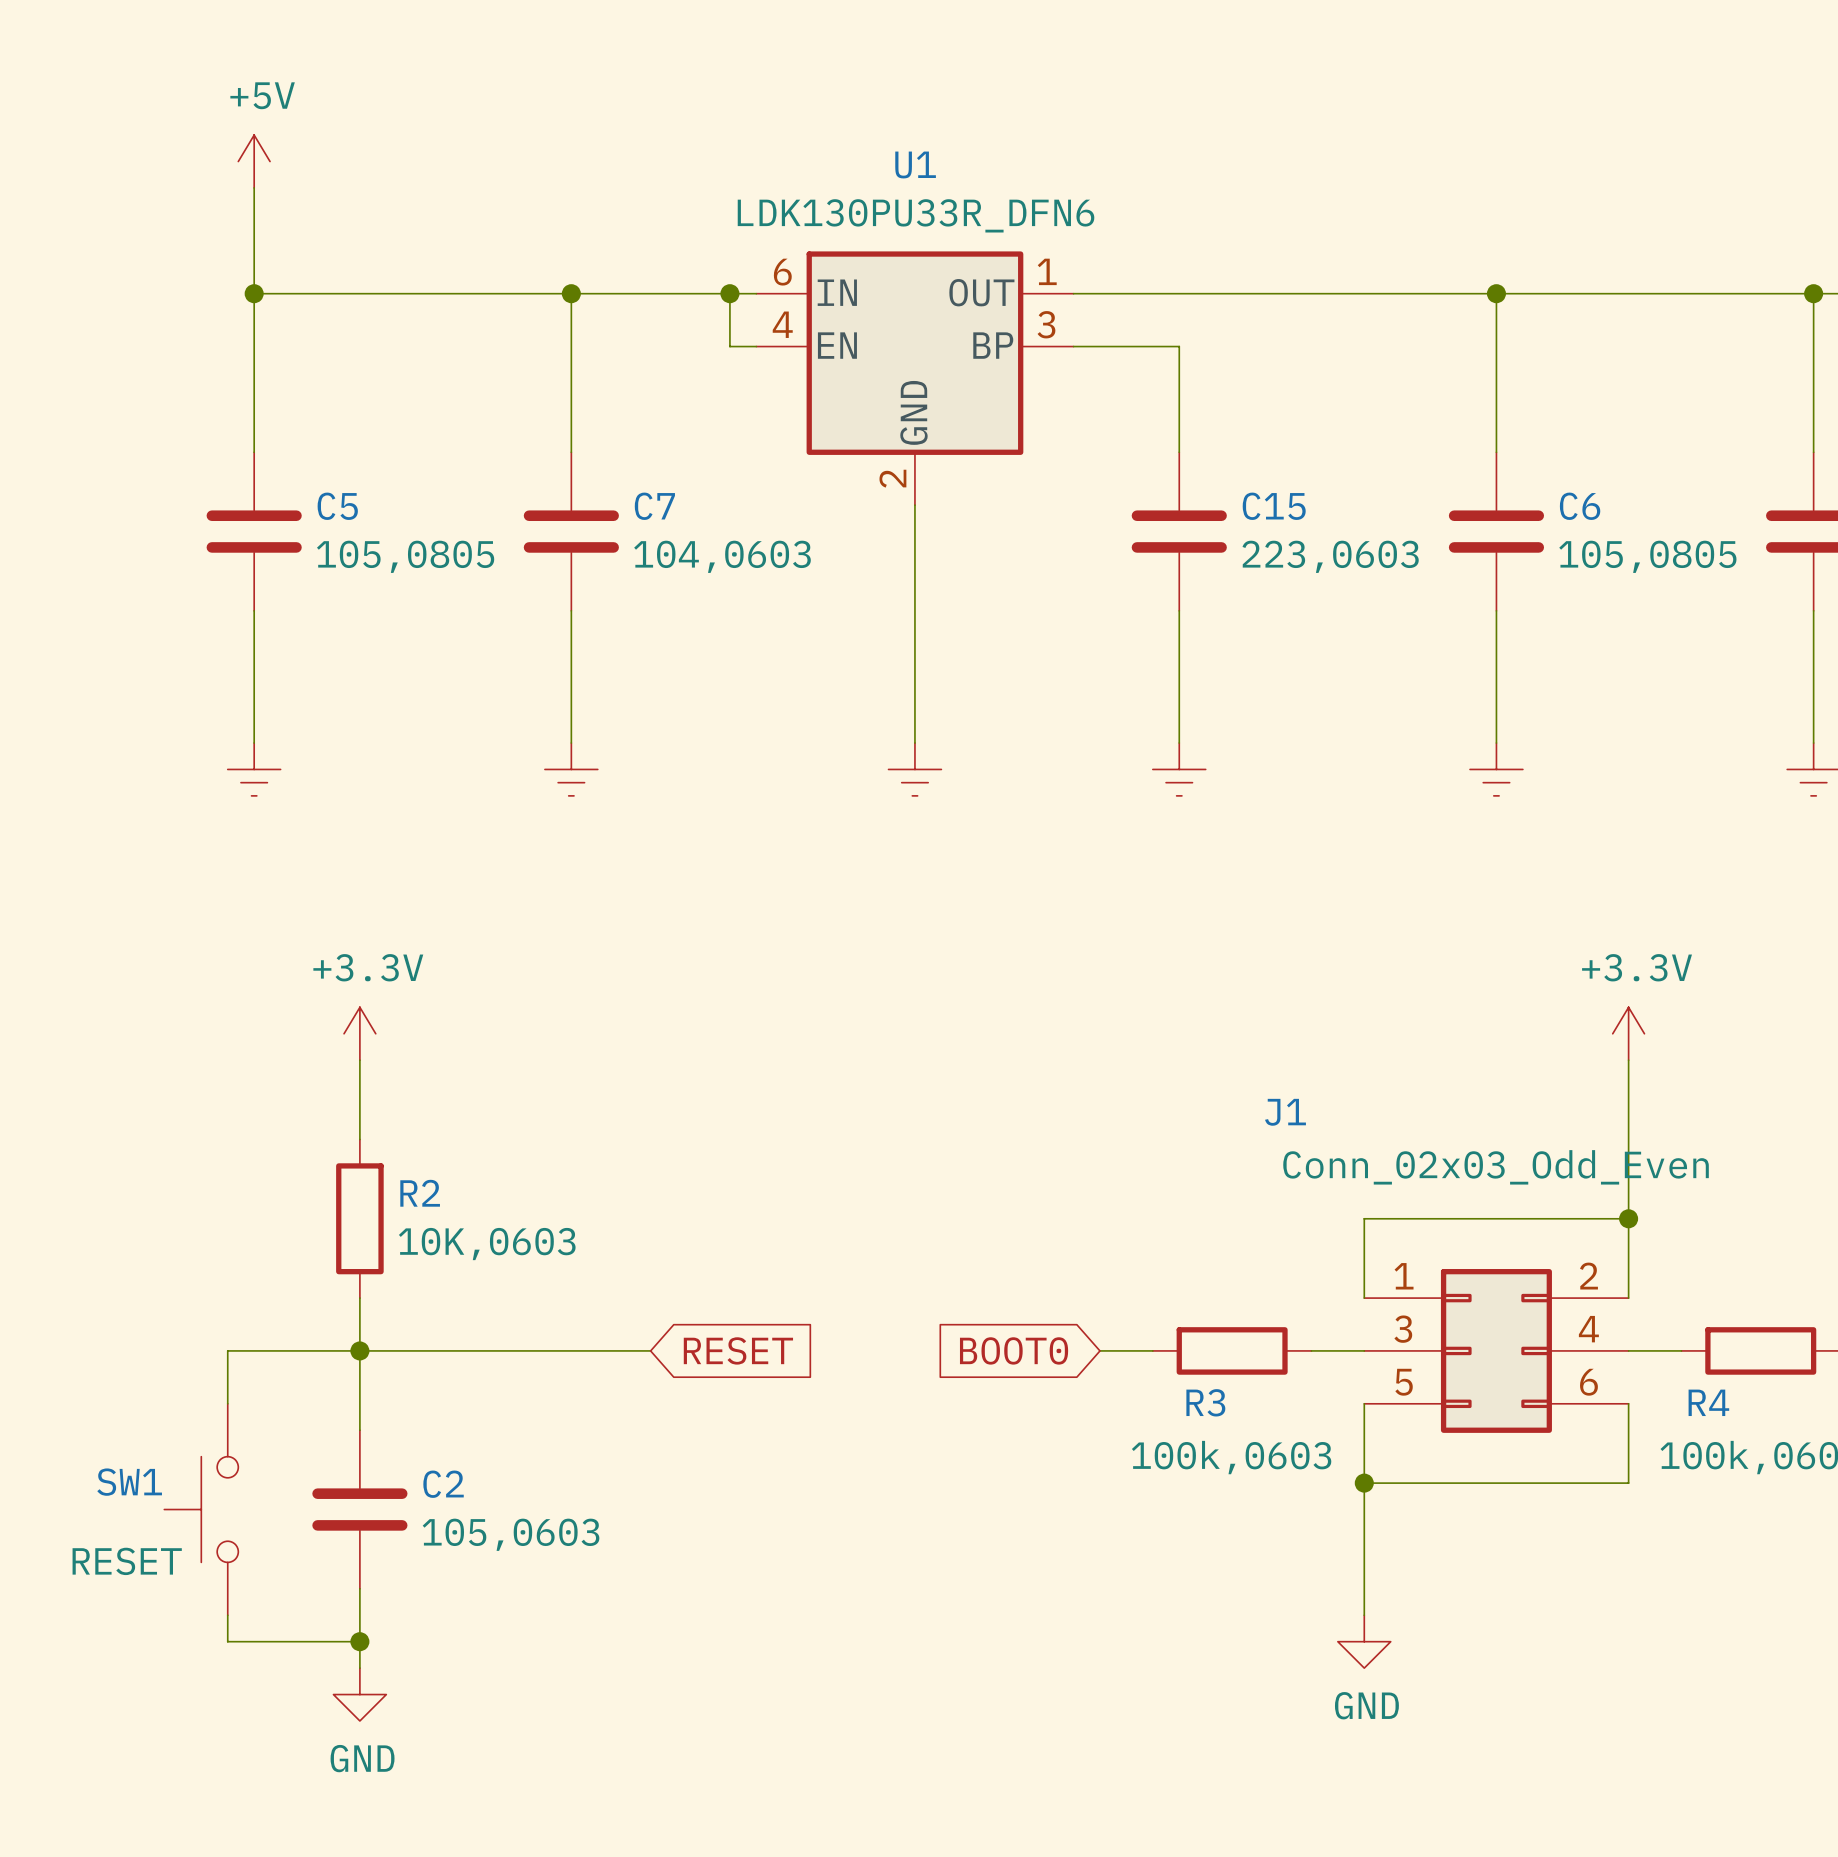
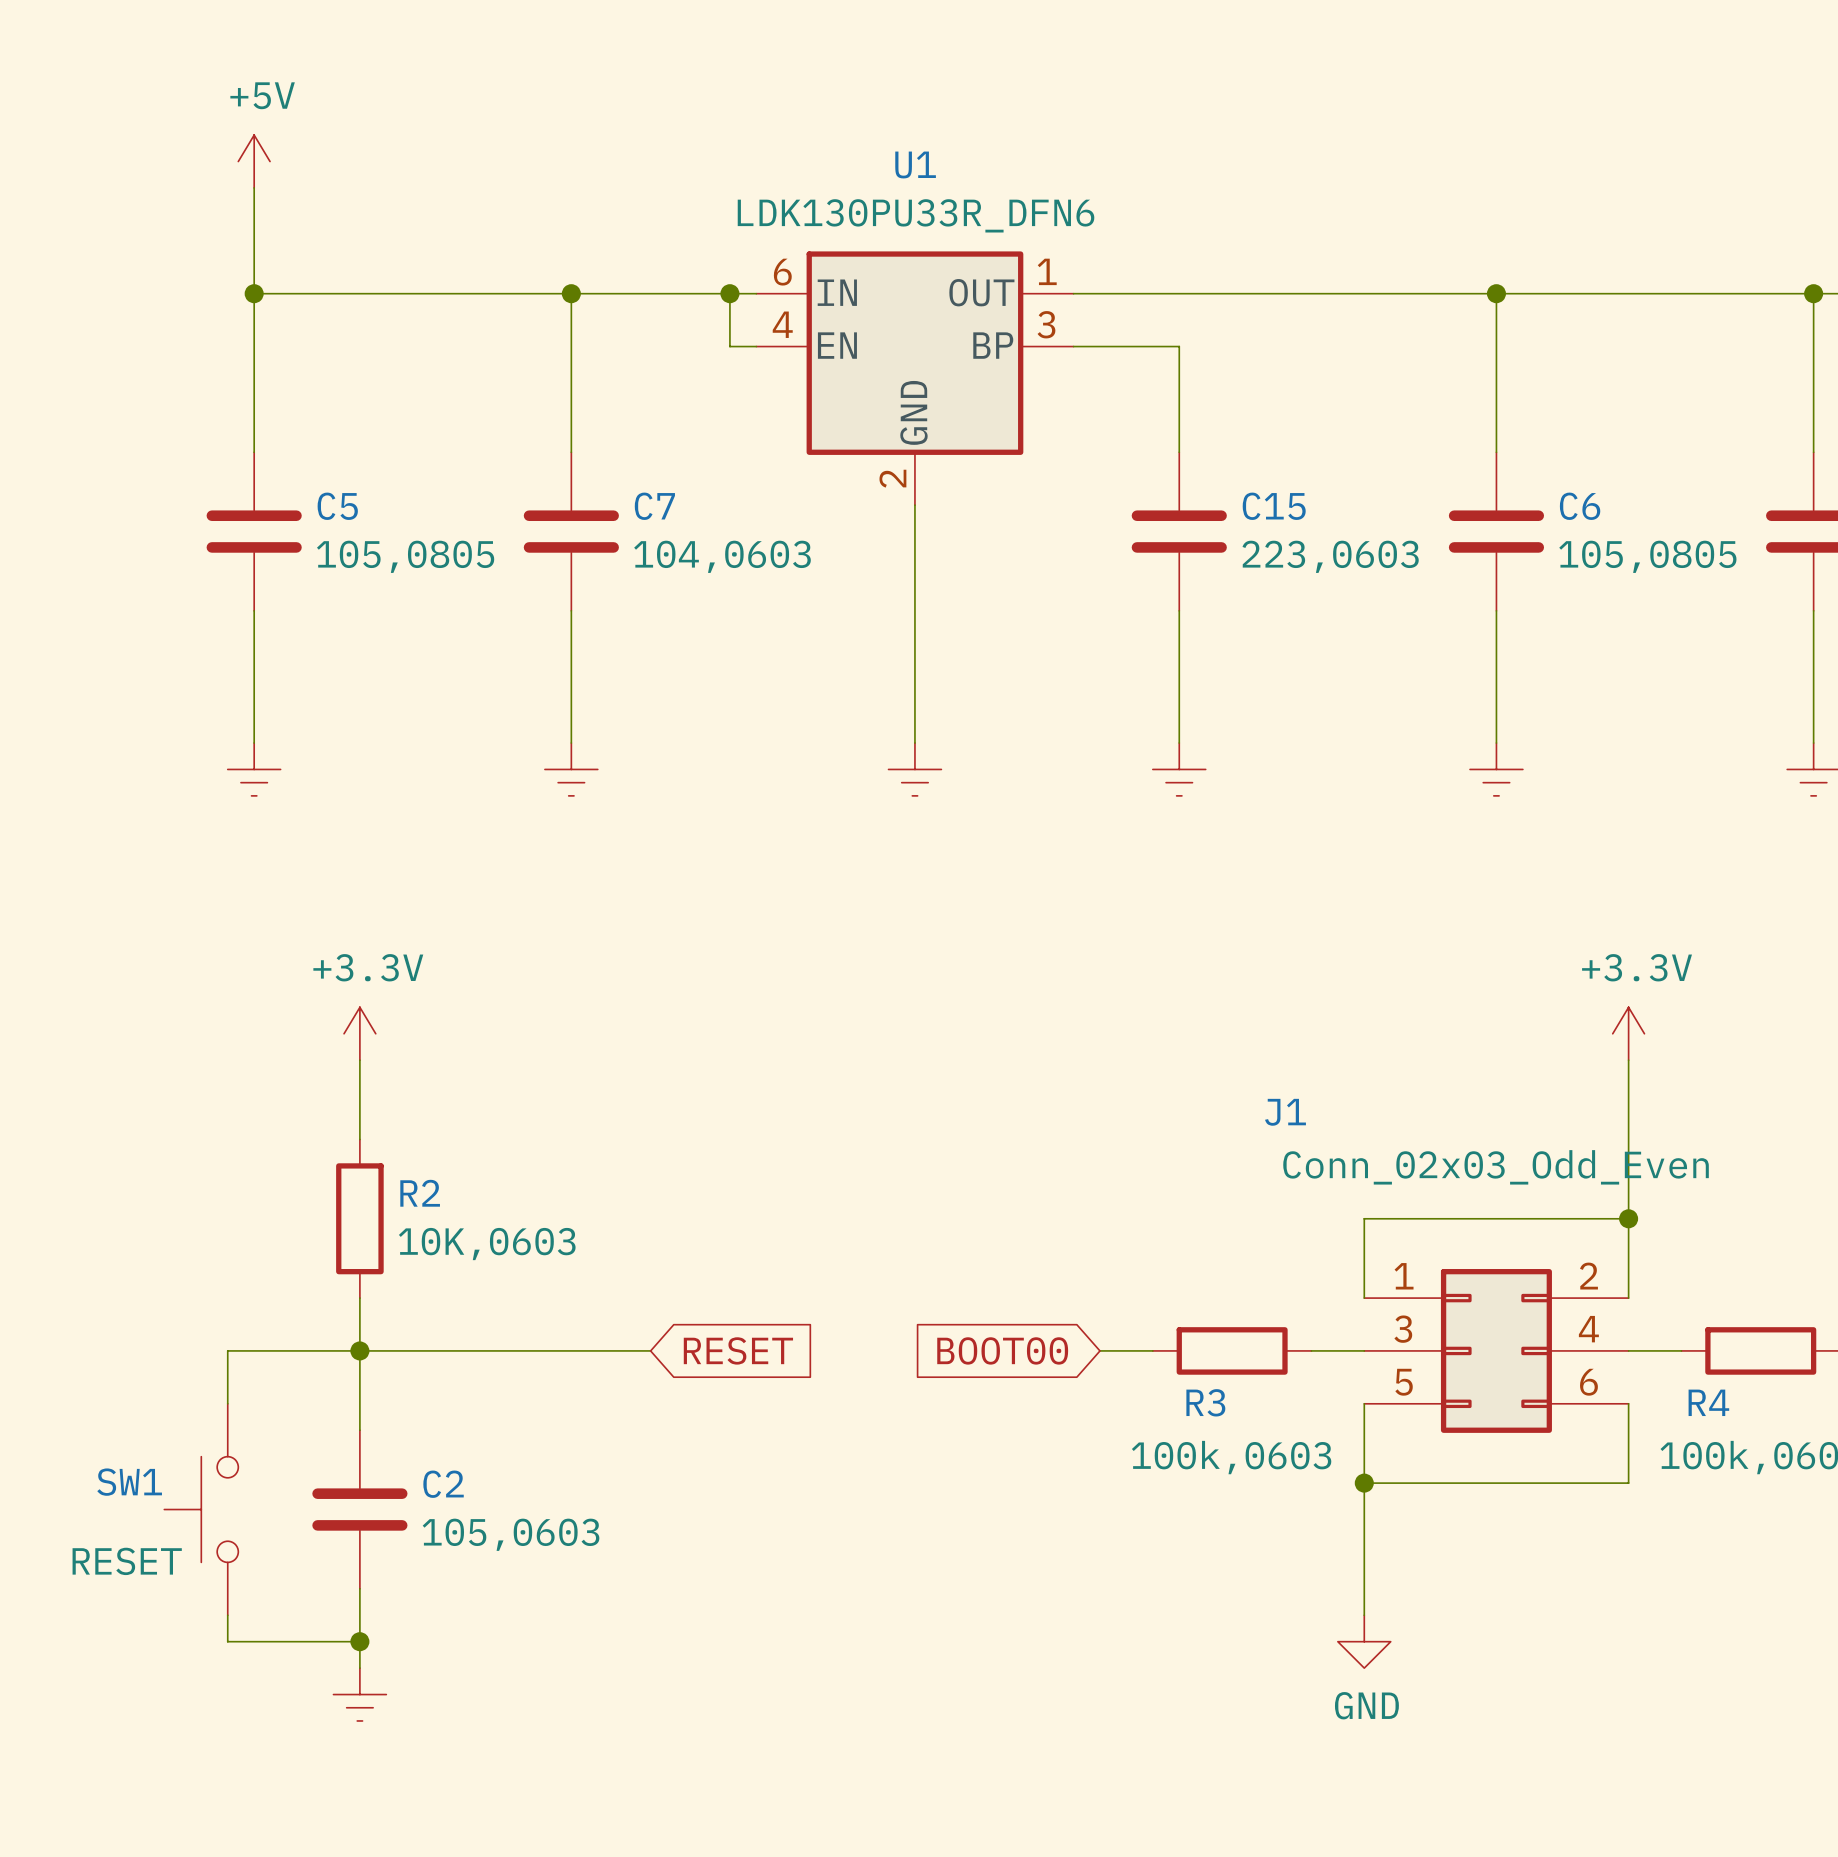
global label: BOOT0 (1014, 1350) -> BOOT00 (1002, 1350)
power symbol shape: [333, 1668, 387, 1721] -> [333, 1668, 387, 1721]
power symbol text: GND (362, 1758) -> none

